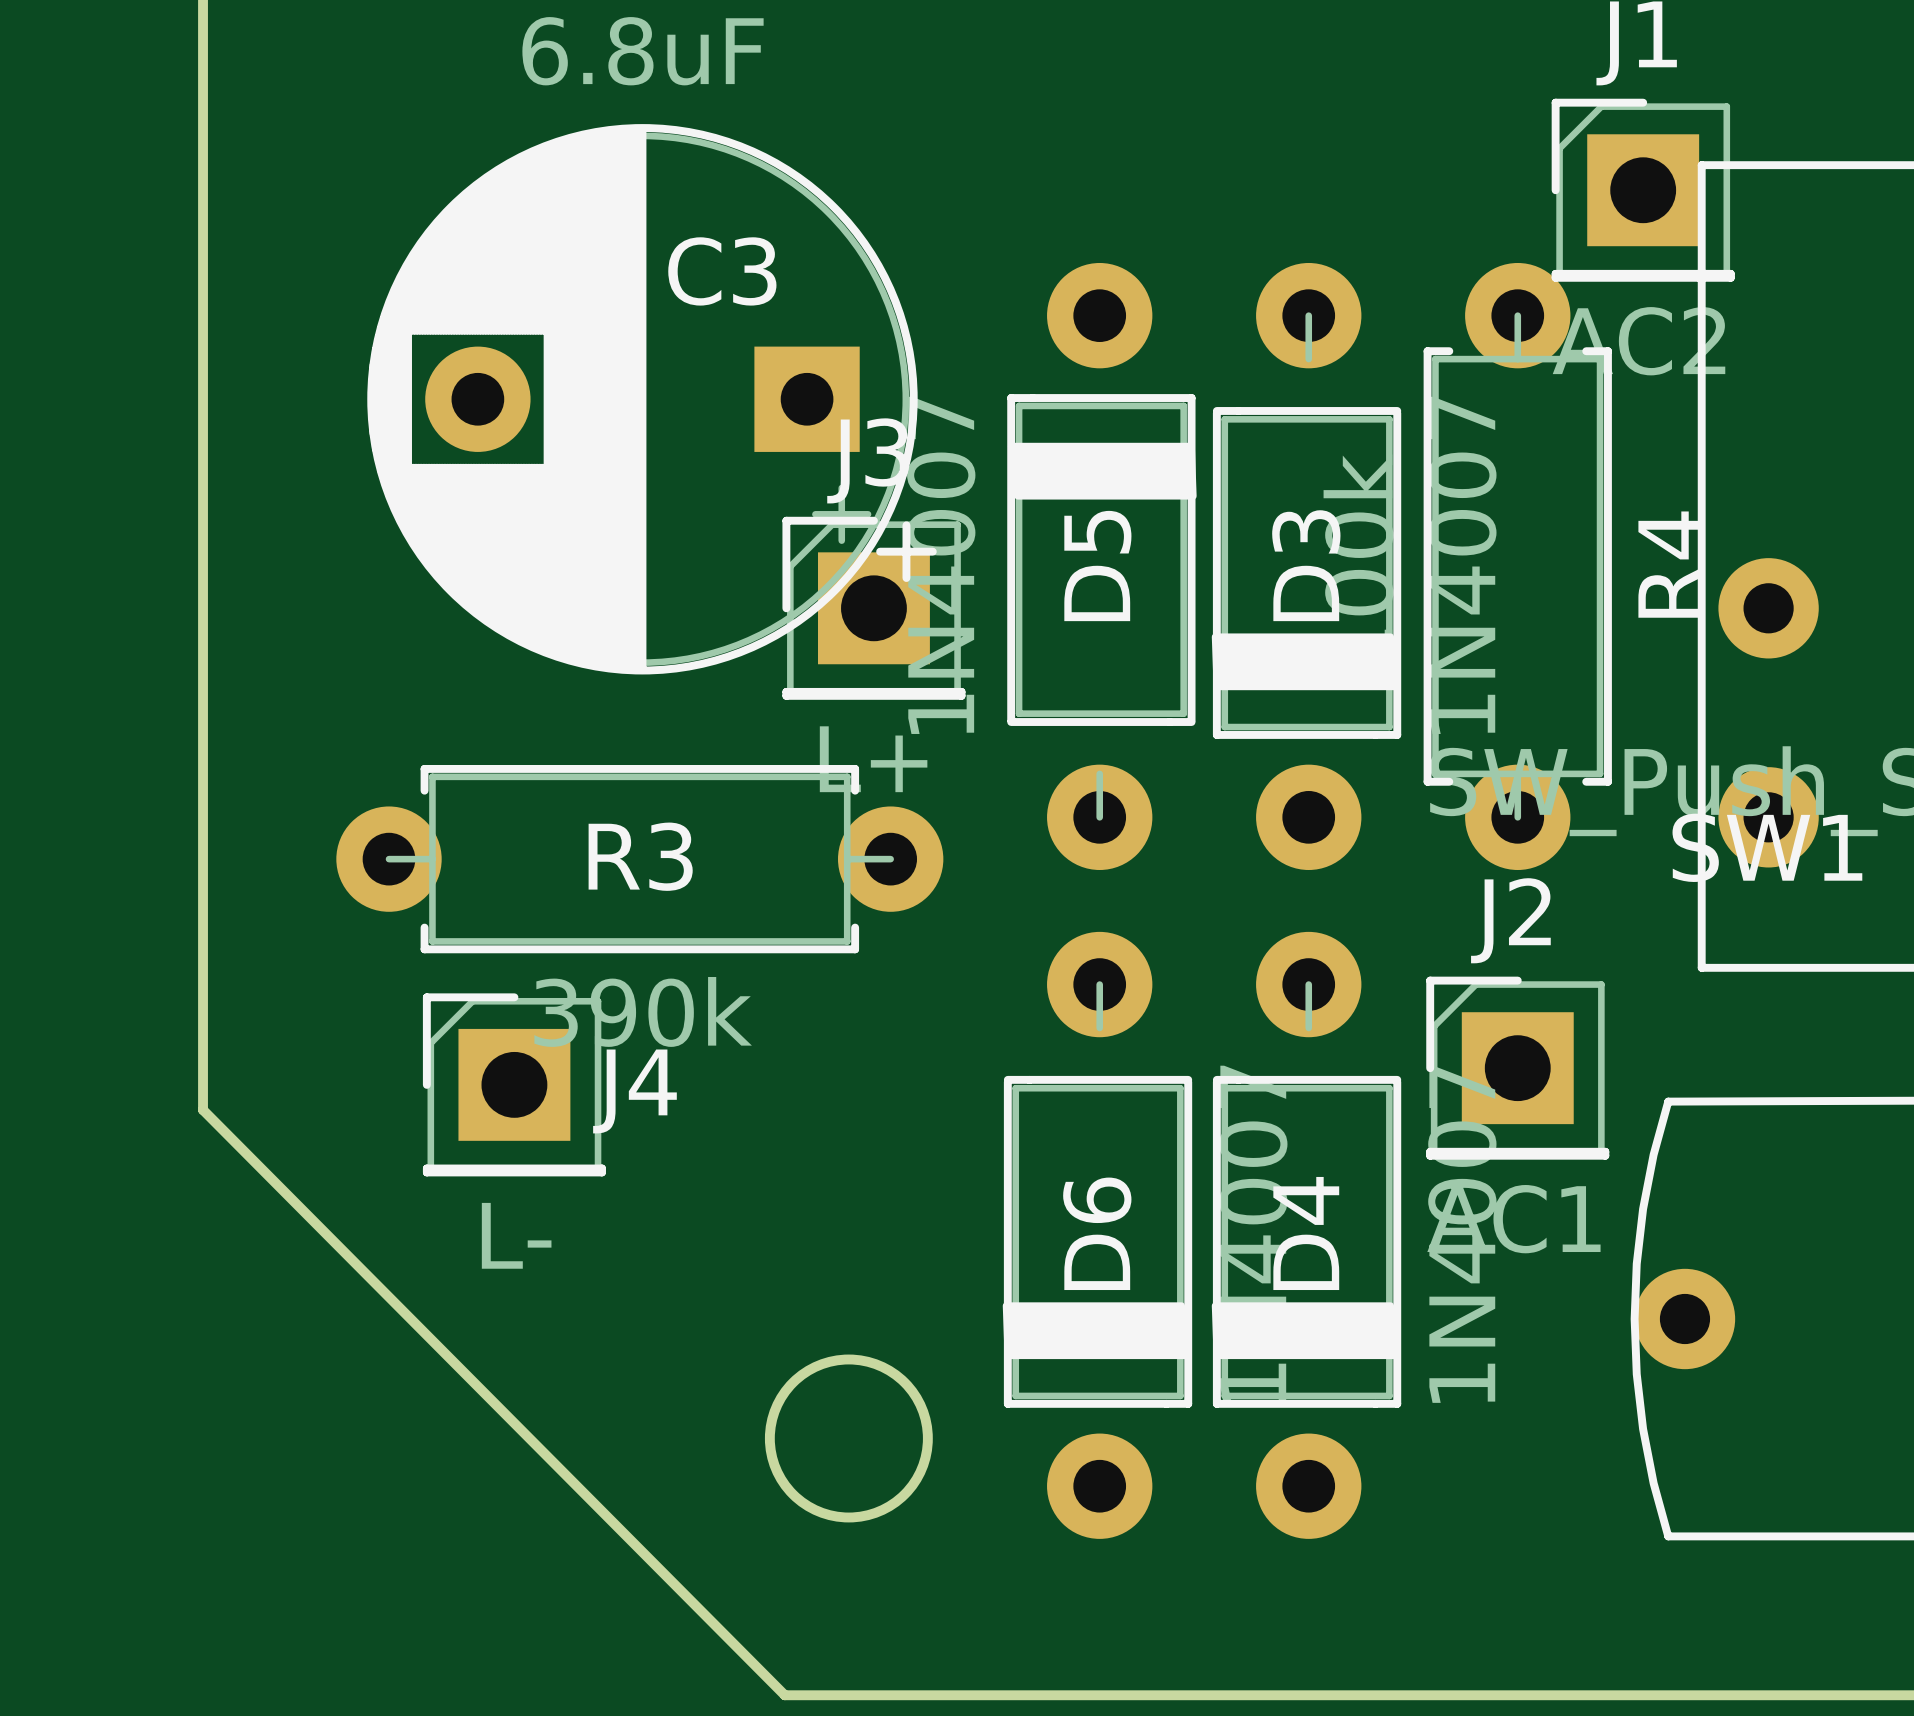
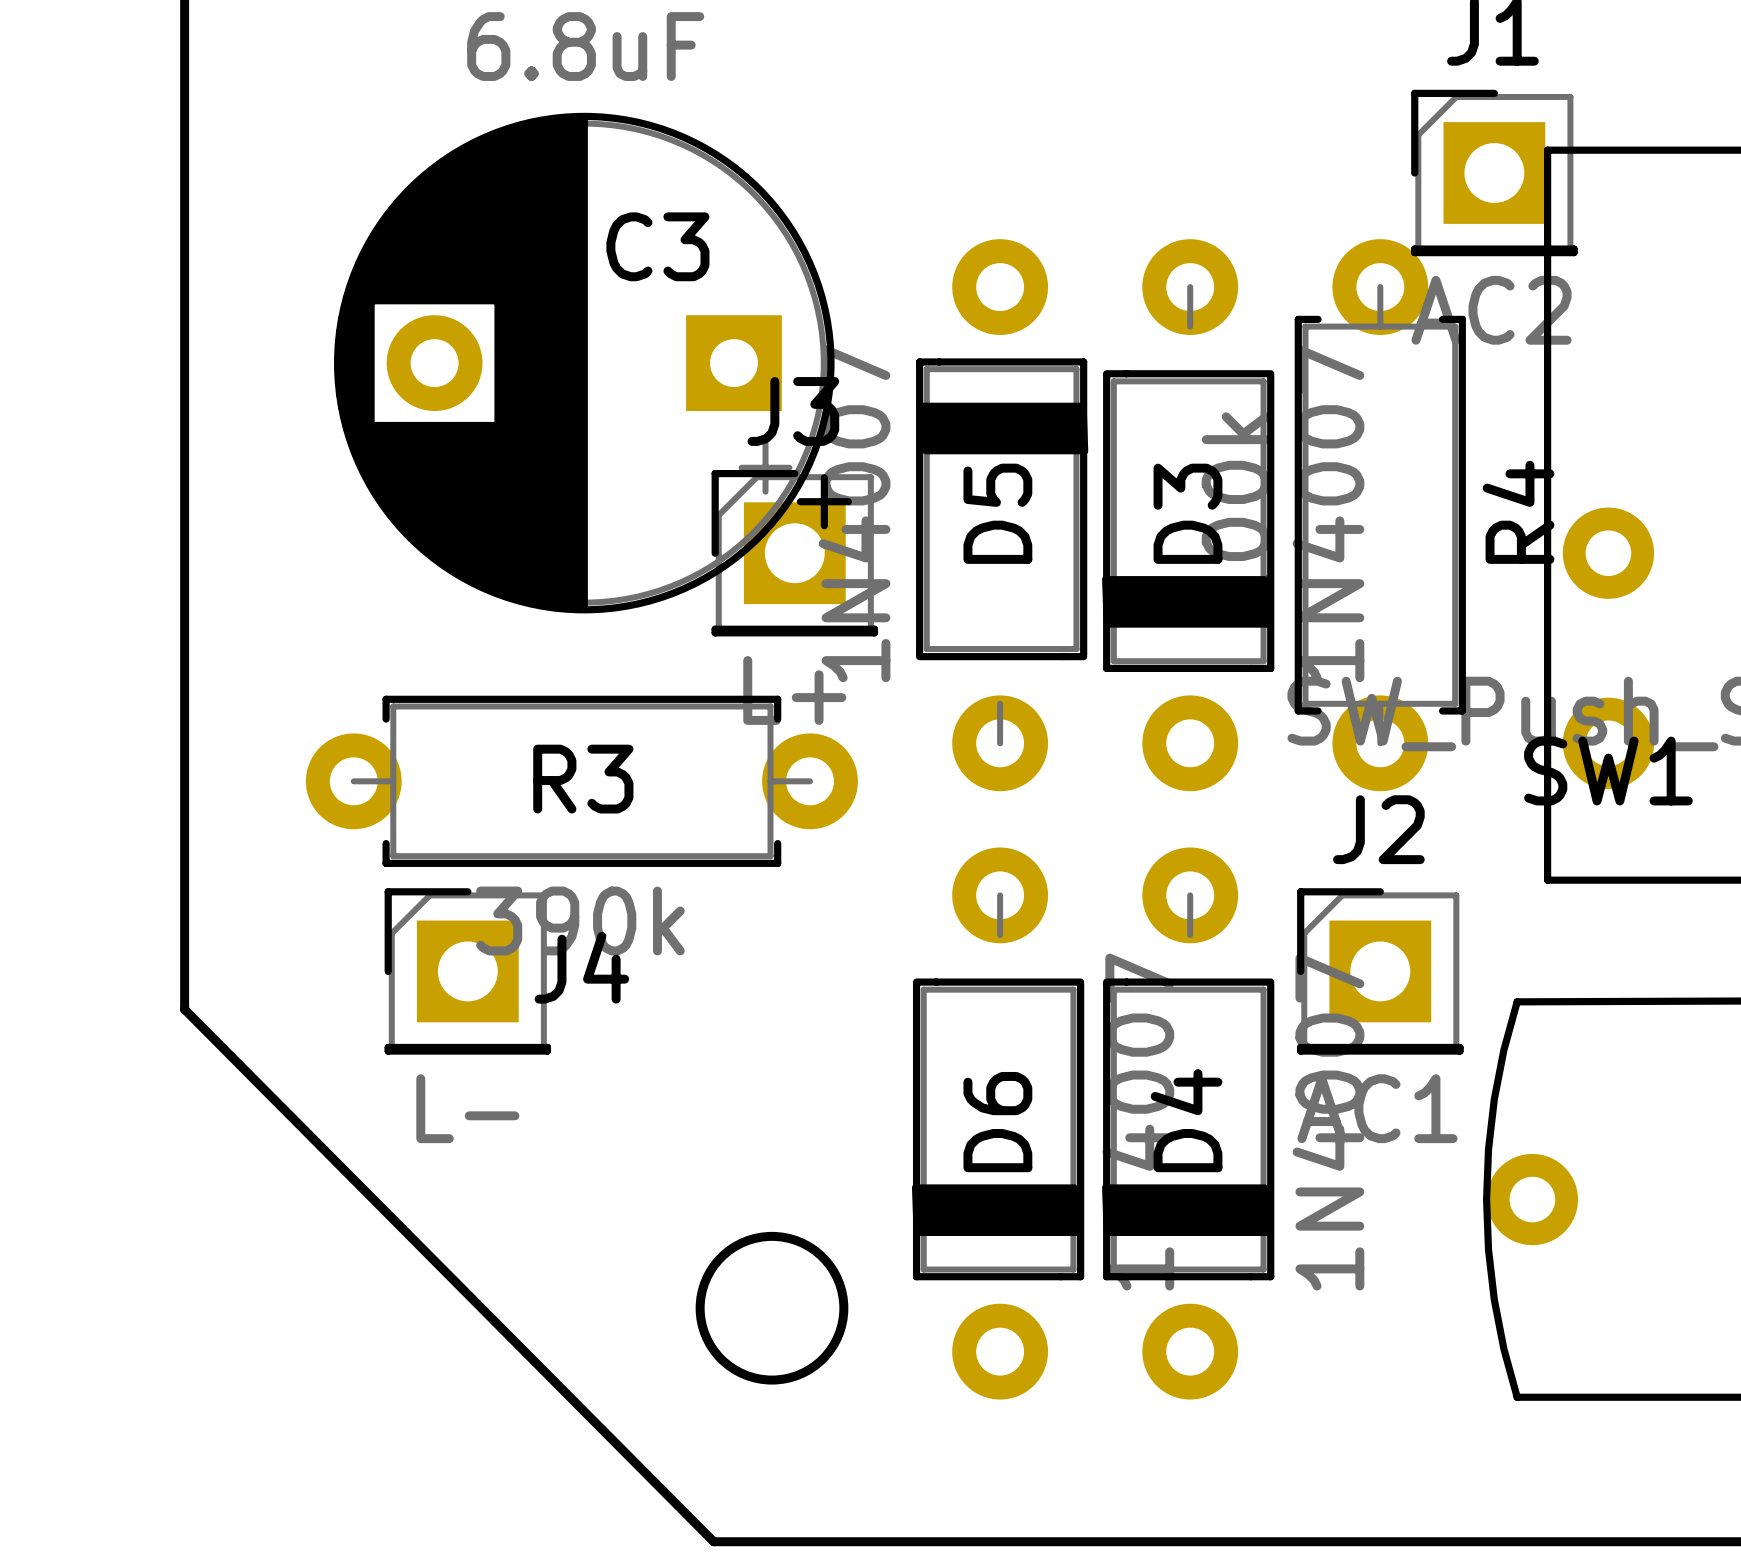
J4 position: (514, 1084) -> (467, 971)

